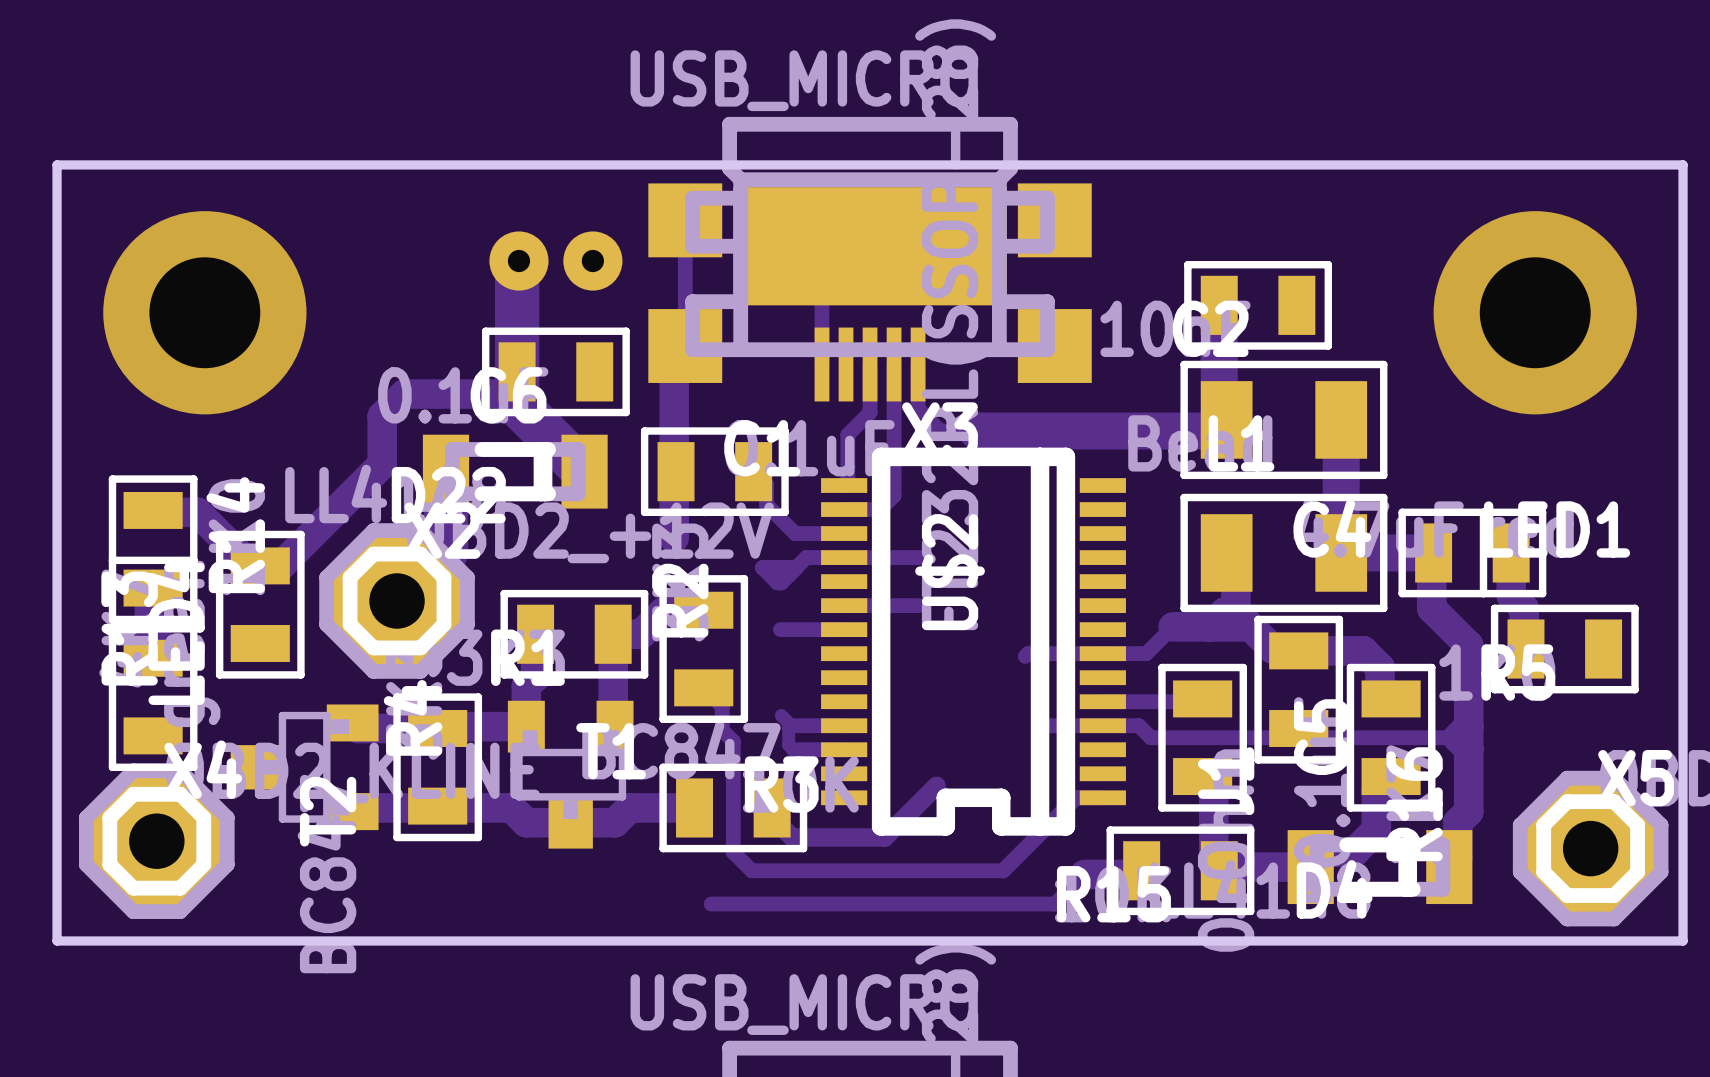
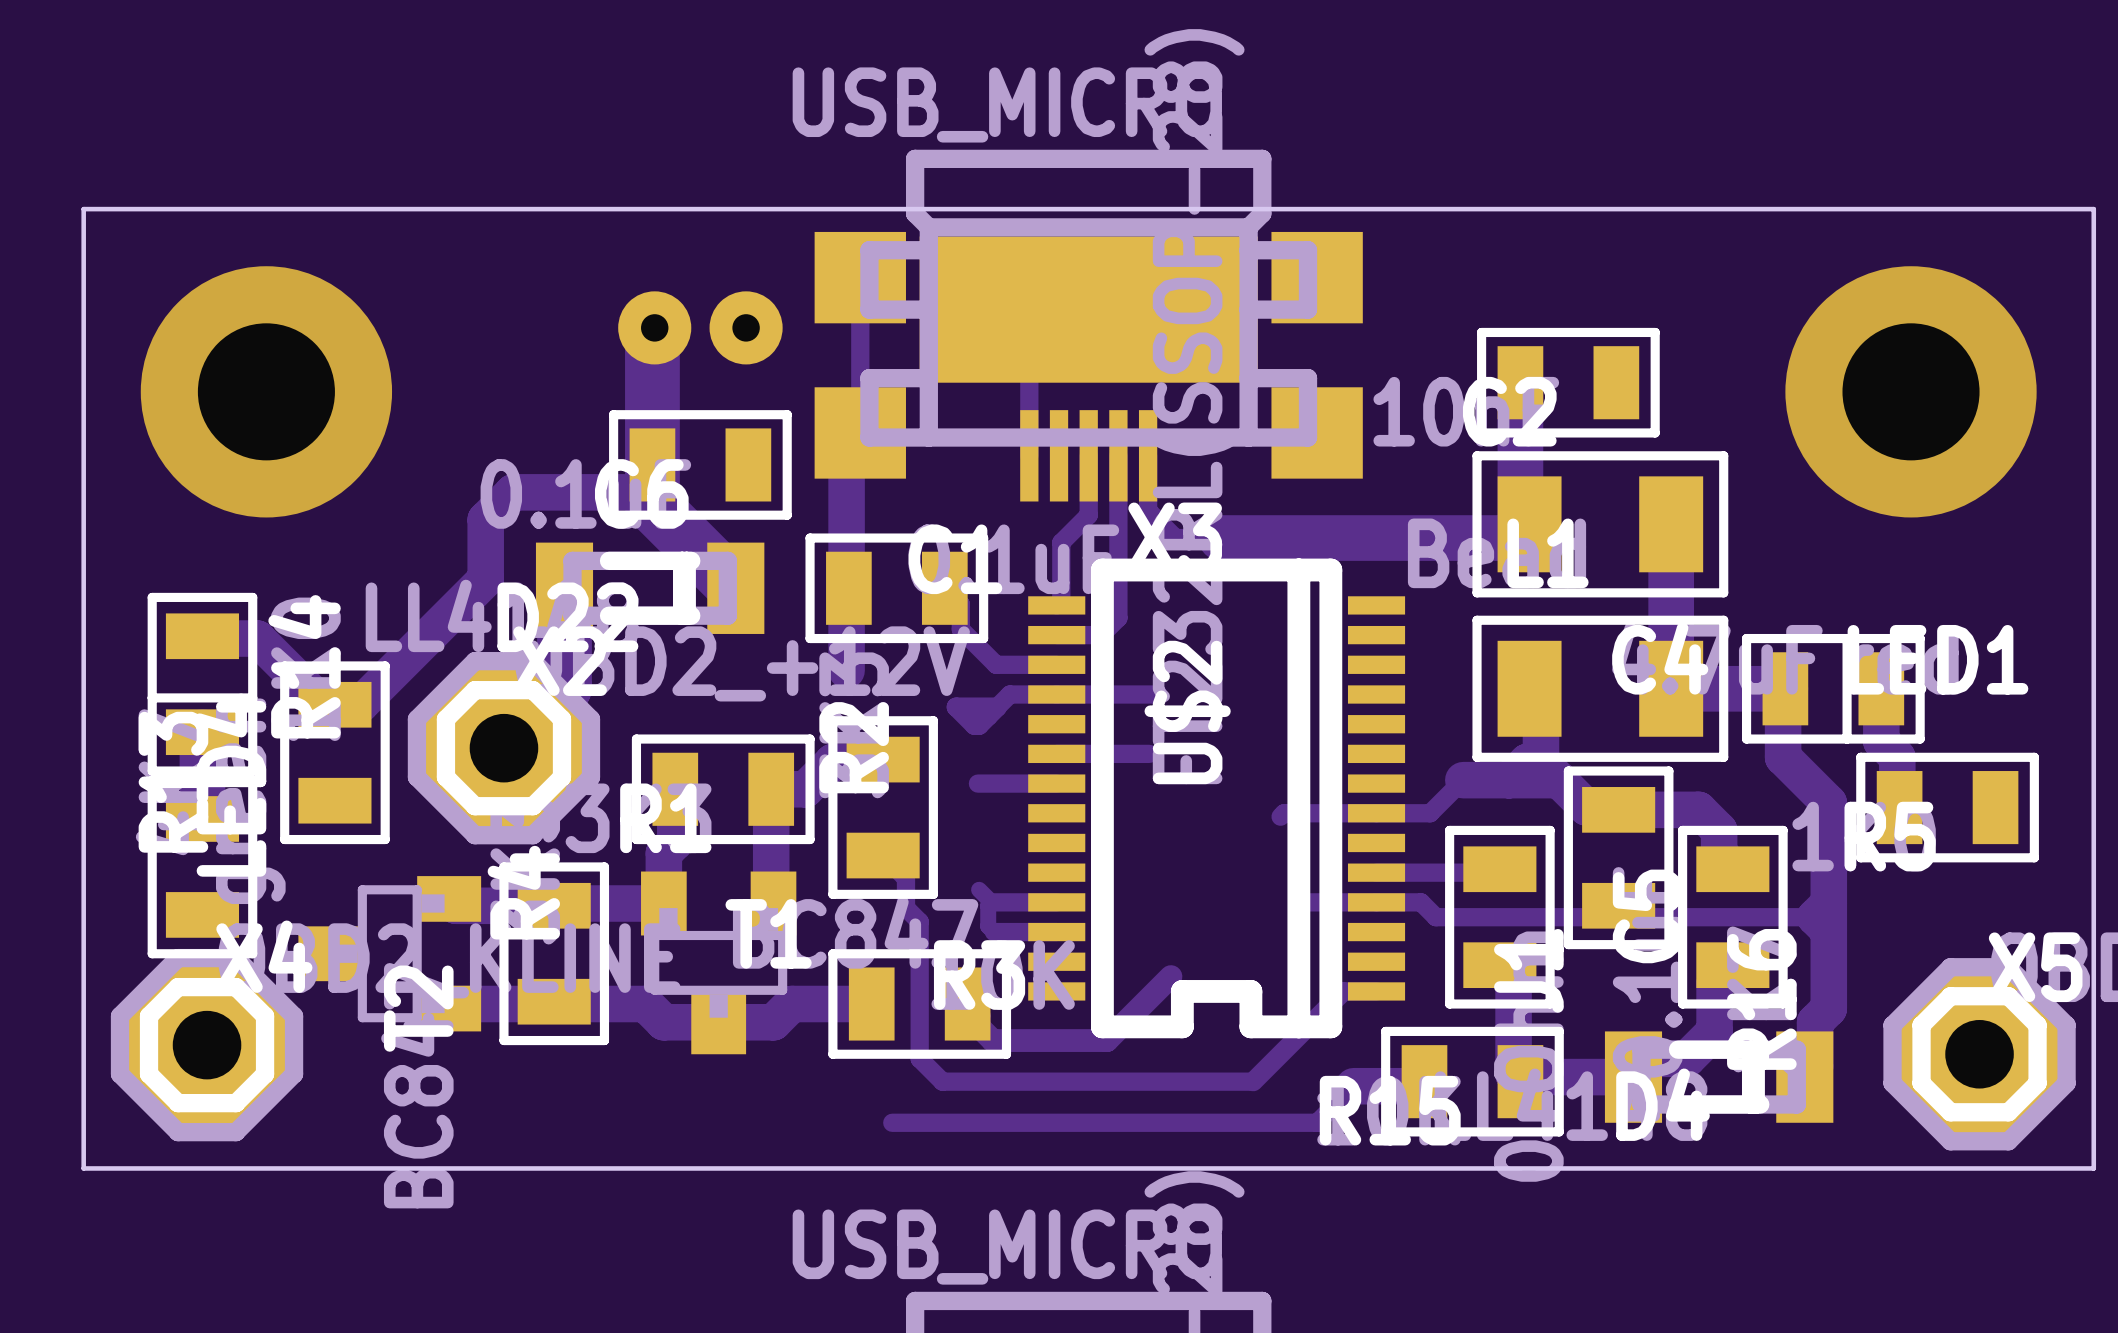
board edge width: thick (57, 164) (57, 940) (1683, 940) (1683, 164) (57, 164) -> thin (83, 209) (83, 1168) (2093, 1168) (2093, 209) (83, 209)

